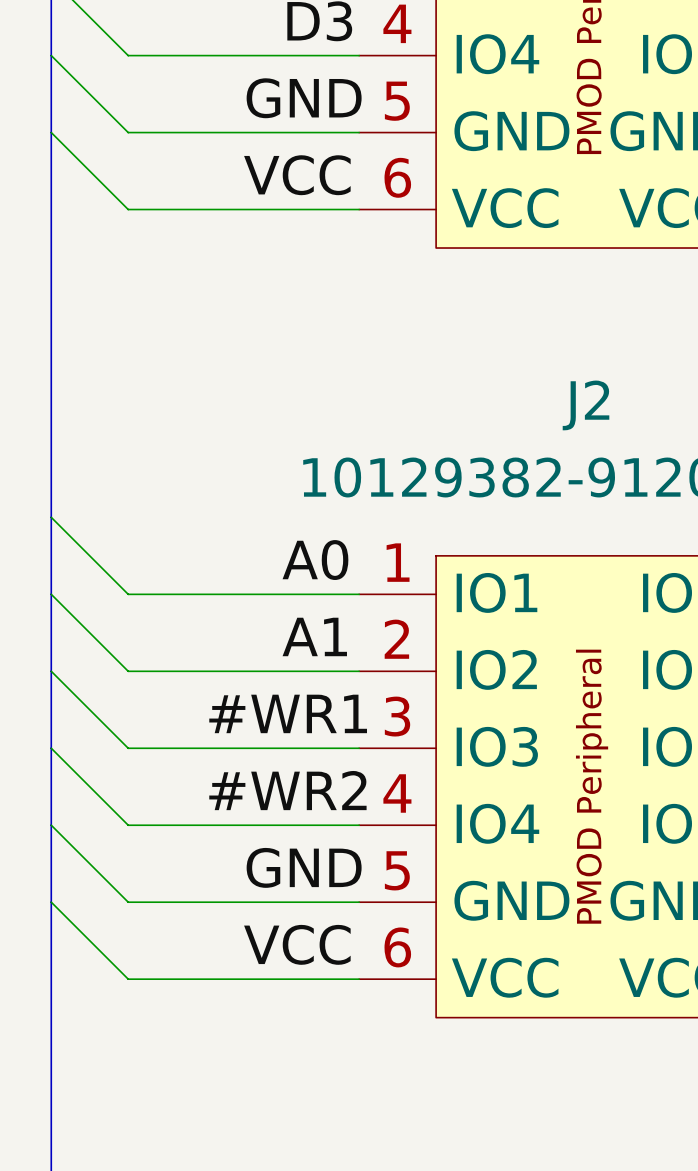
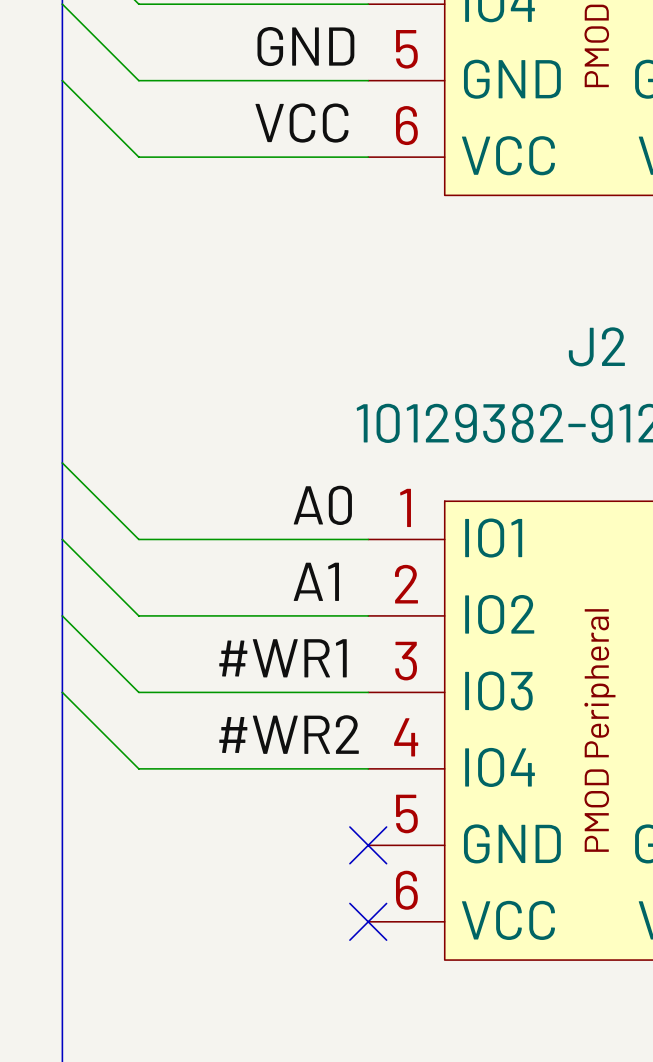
wire: (51, 825) (128, 902) (359, 902) -> none
label: GND (304, 867) -> none
wire: (51, 902) (128, 979) (359, 979) -> none
no-connect mark: none -> (368, 845)
label: VCC (297, 944) -> none
no-connect mark: none -> (368, 921)

